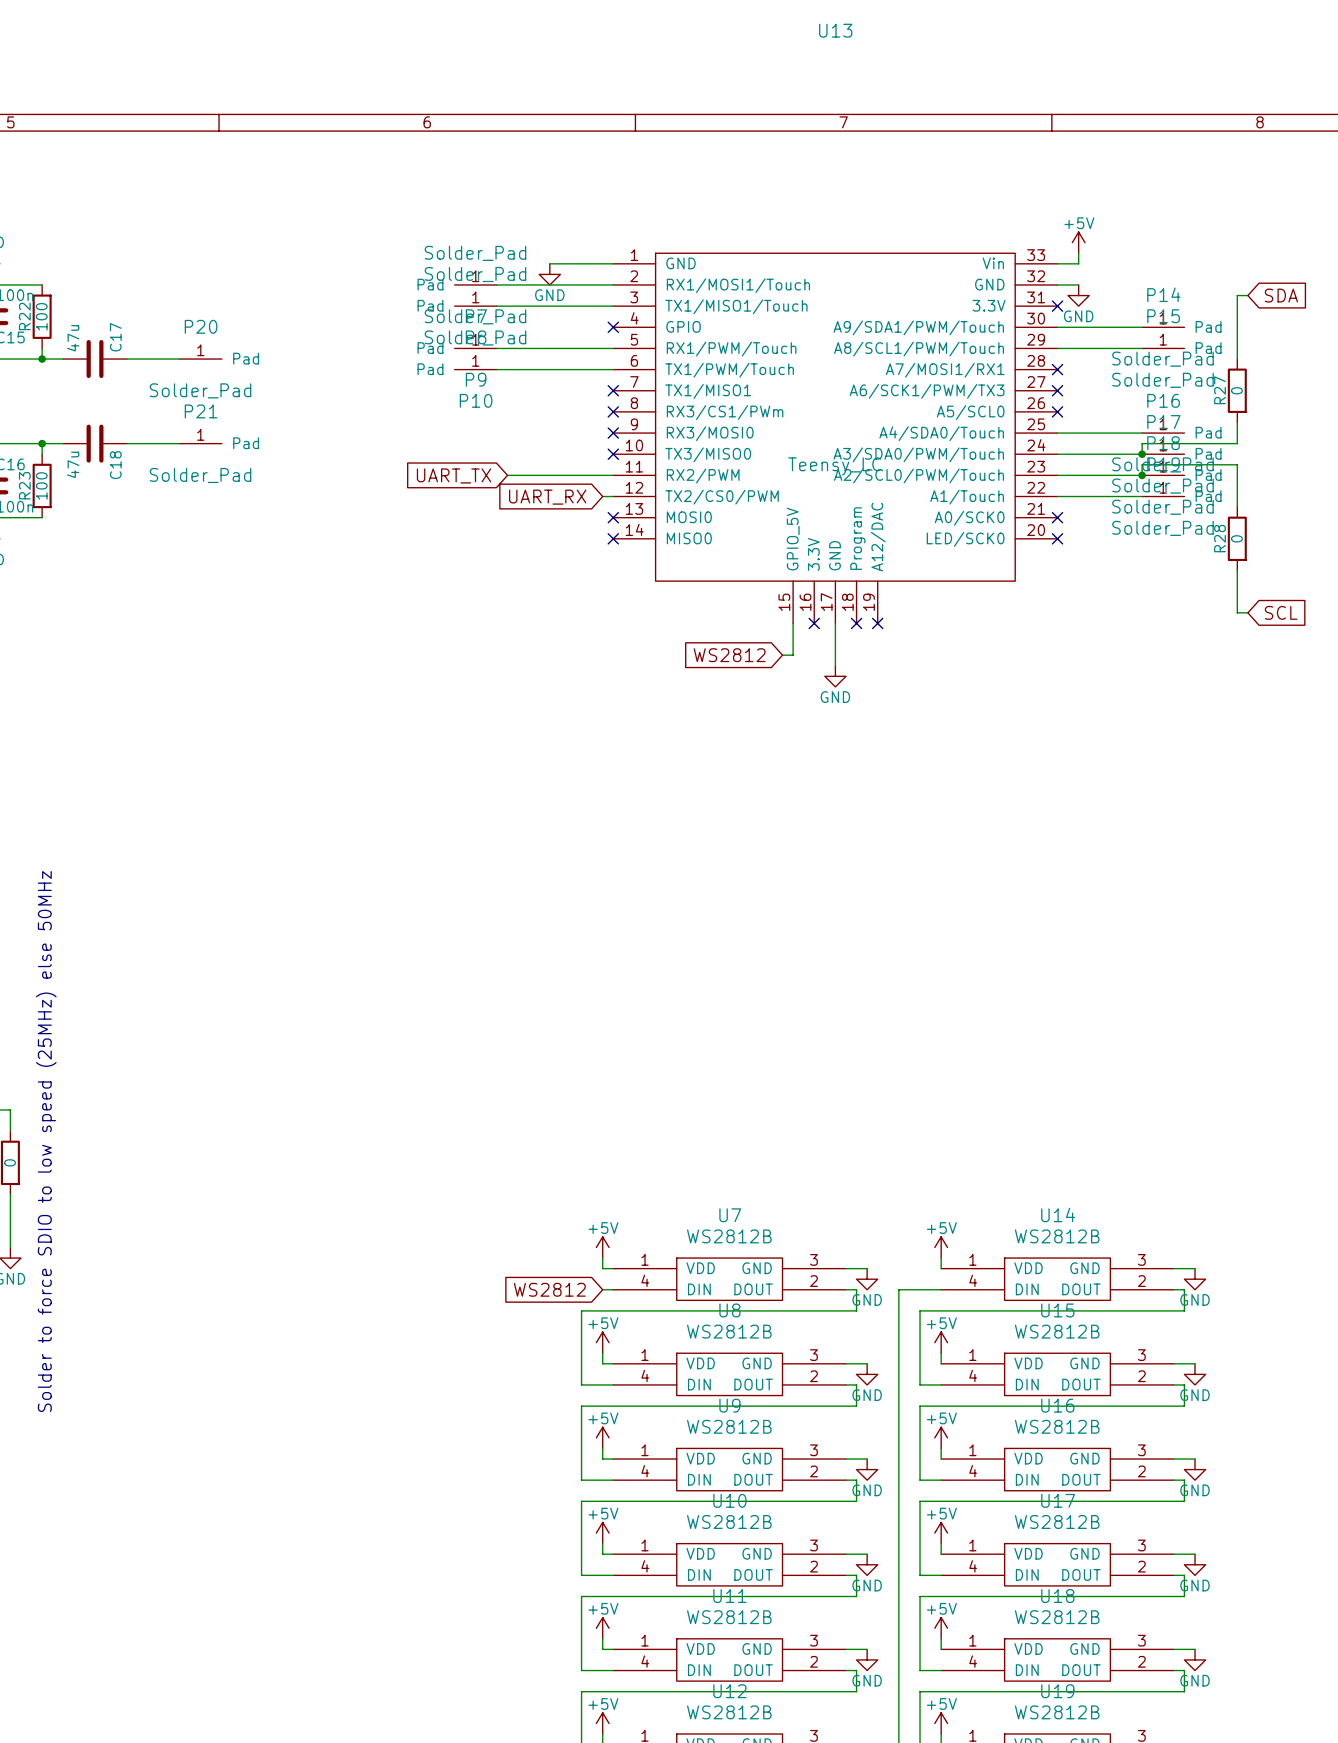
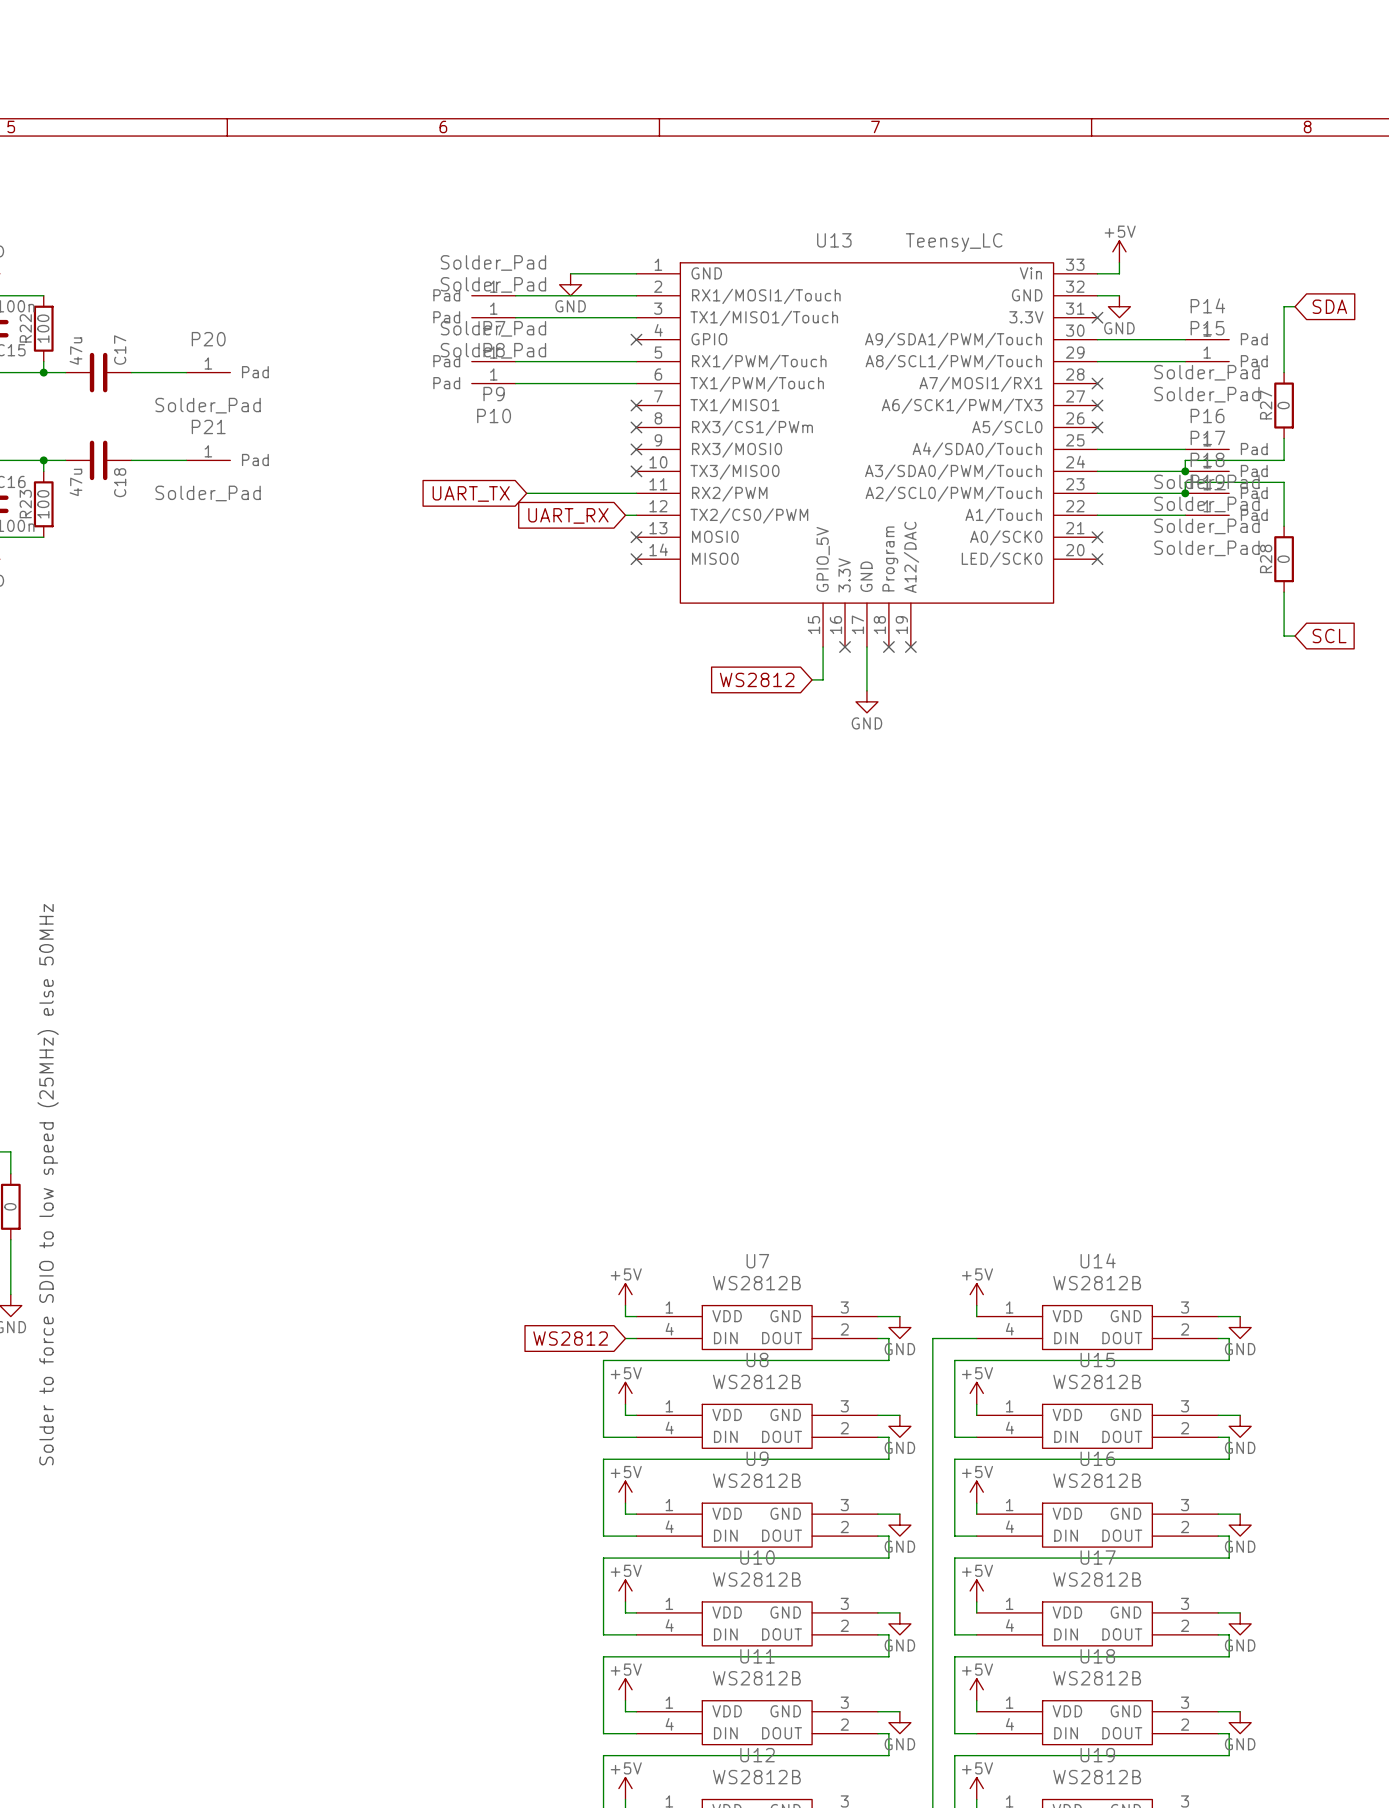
U13 name position: U13 (835, 30) -> U13 (834, 240)
U13 value position: Teensy_LC (834, 466) -> Teensy_LC (954, 242)

